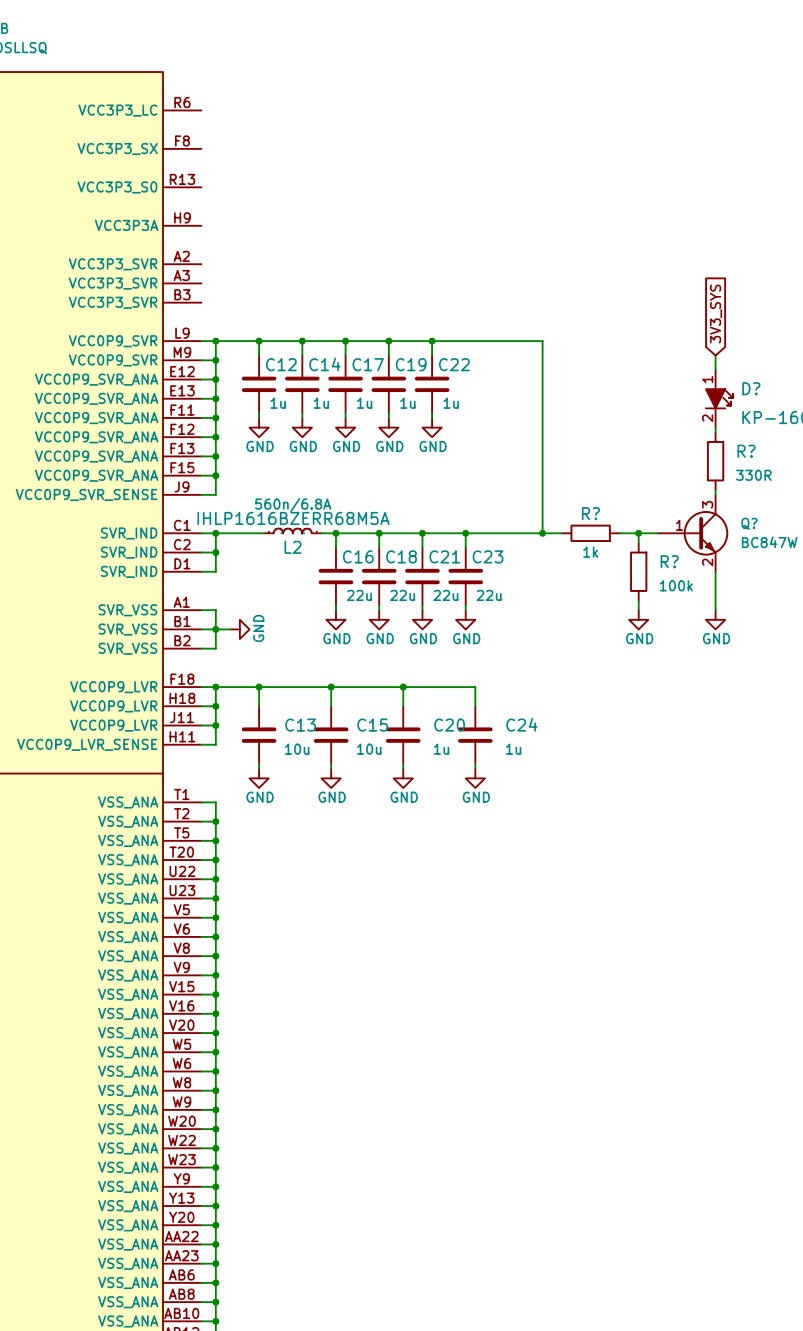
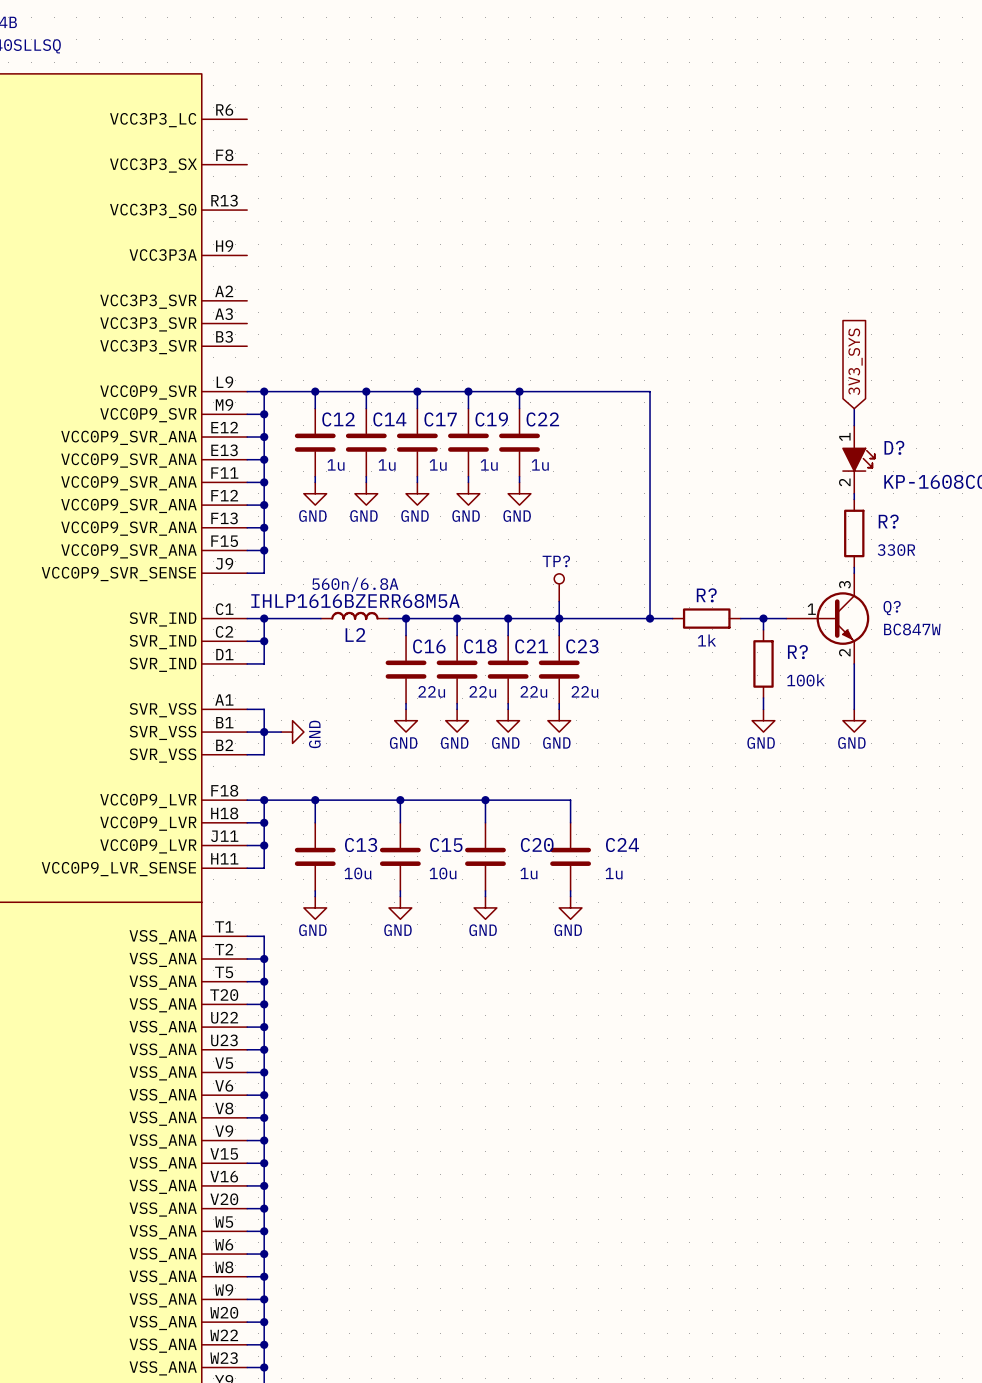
TP?: none -> (559, 587)
wire: none -> (559, 601) (559, 618)

